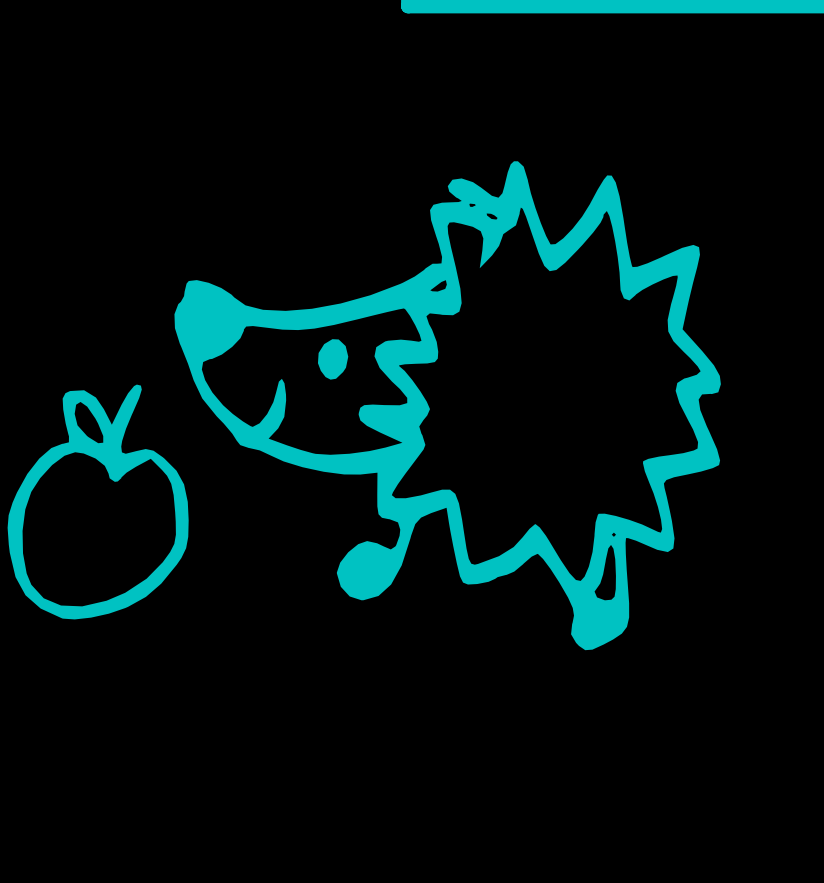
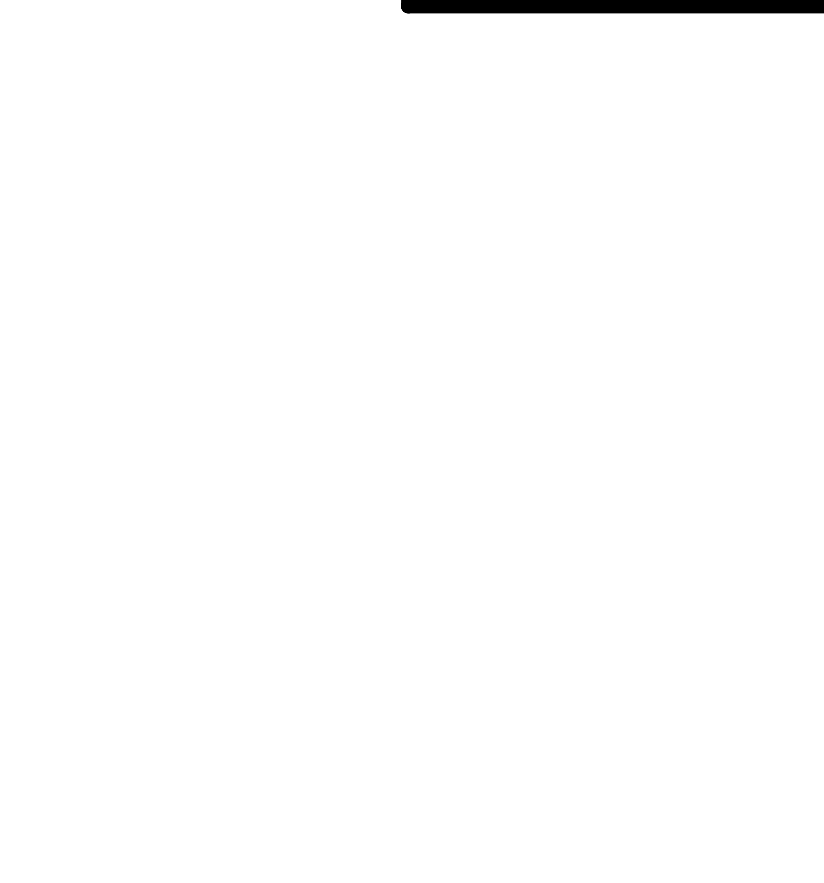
drawing: [7, 161, 721, 651] -> none

